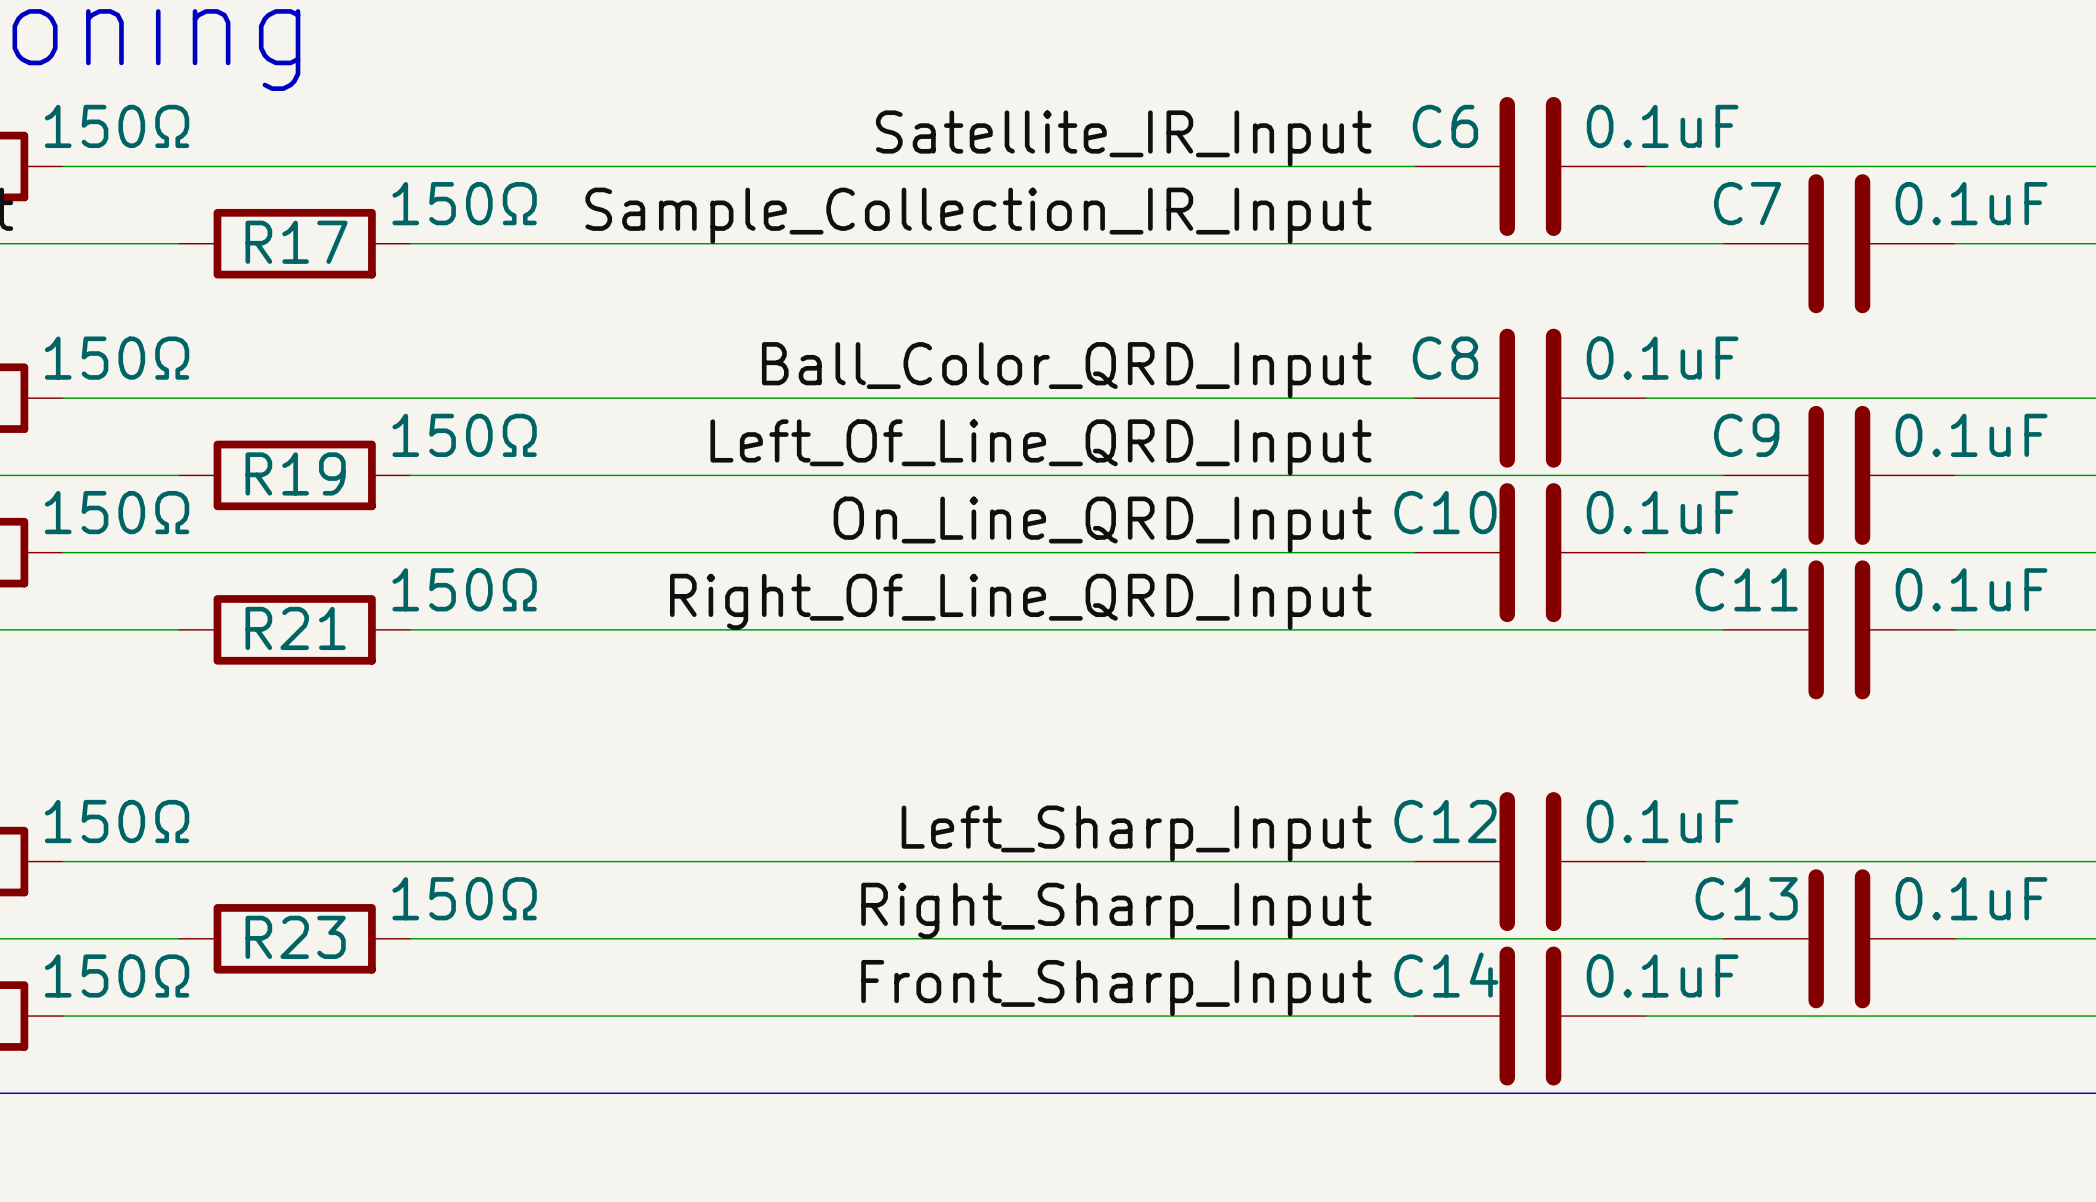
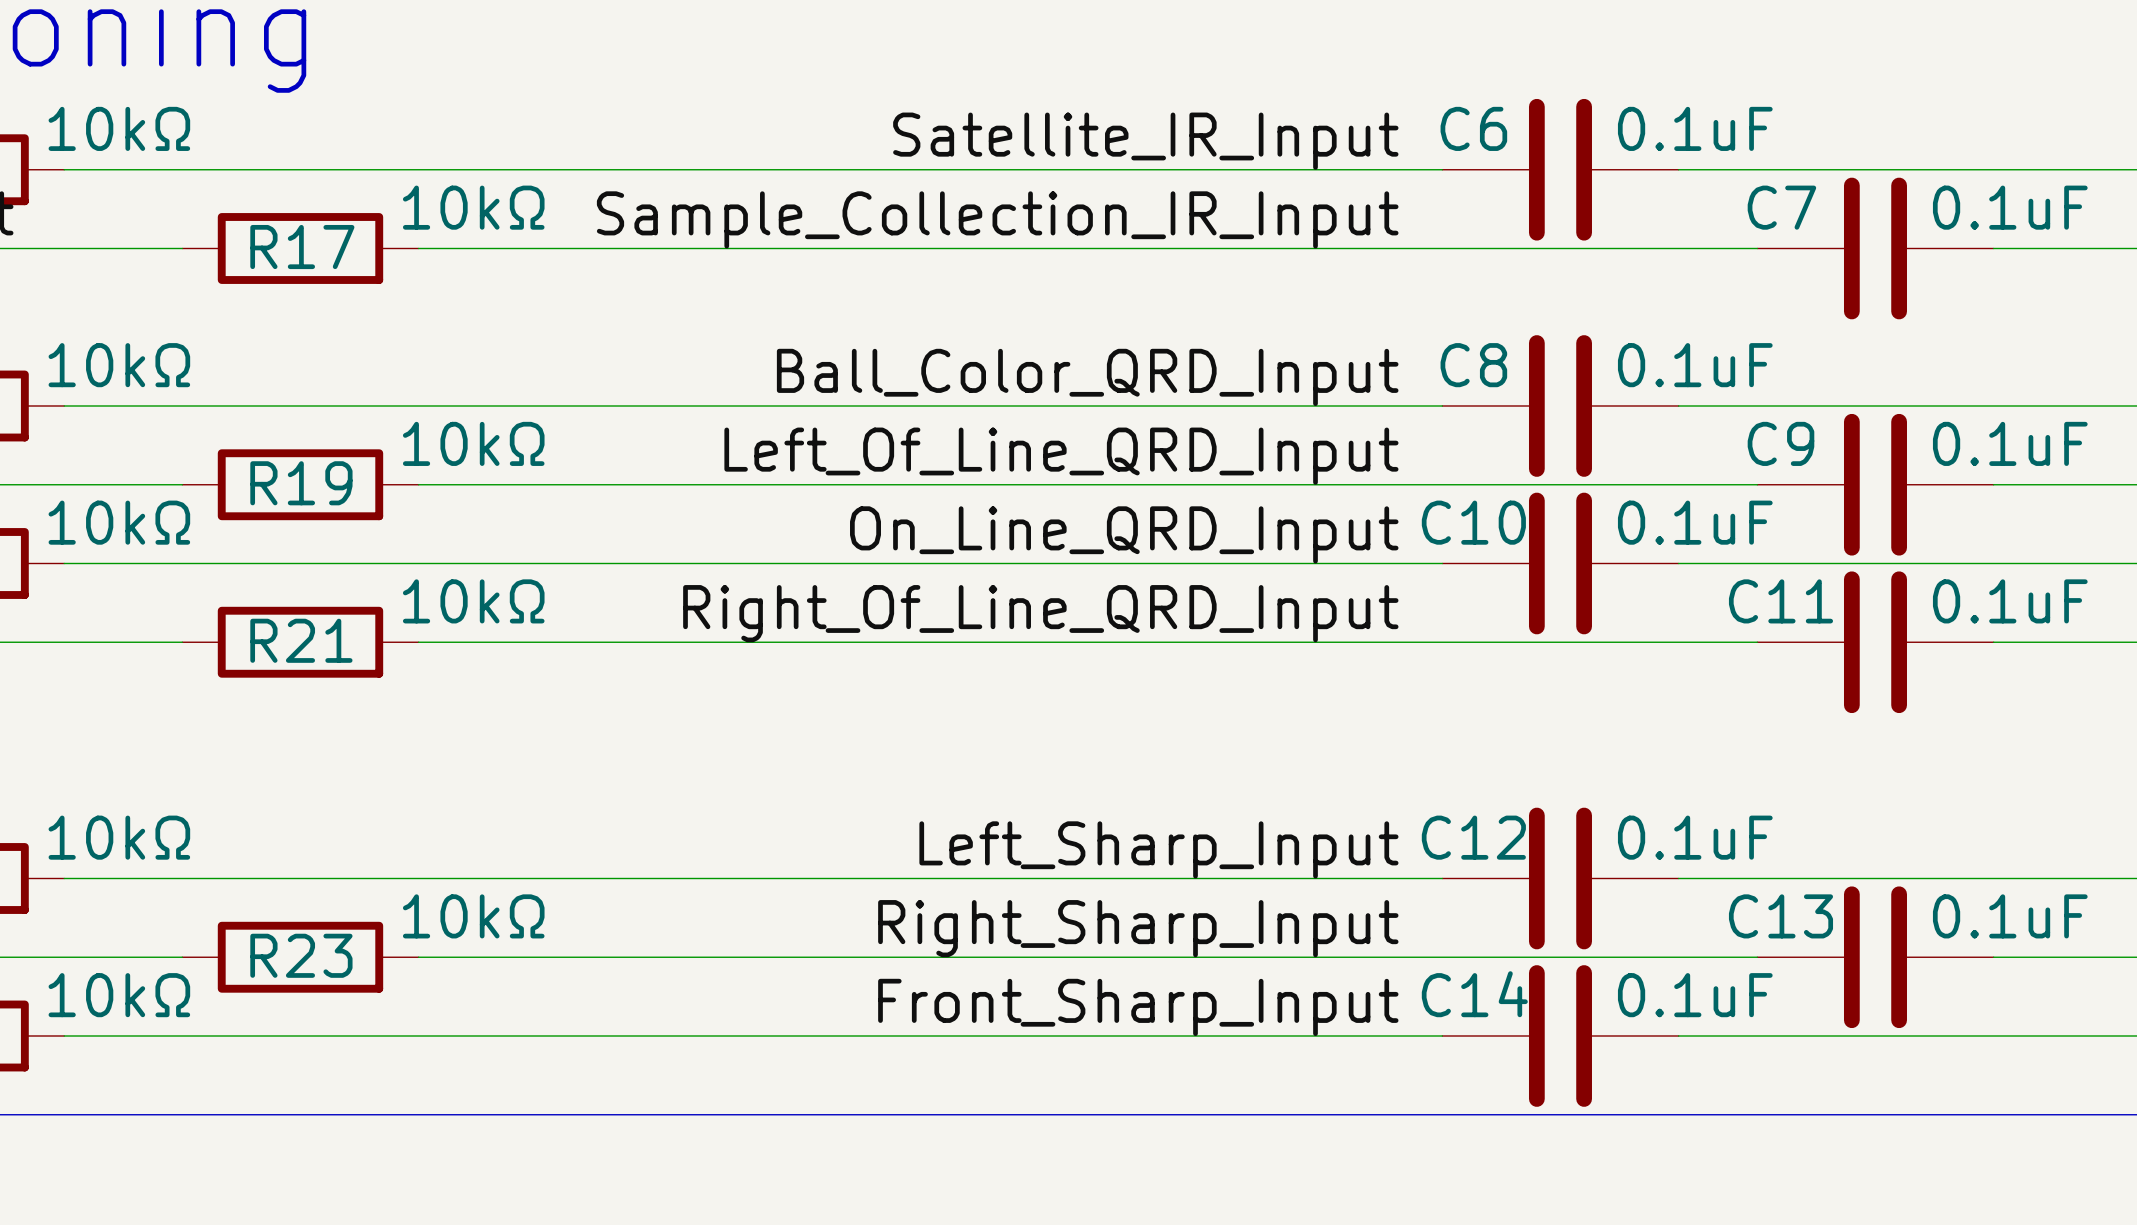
part value: 150Ω (117, 126) -> 10kΩ (119, 128)
R17 value: 150Ω (464, 203) -> 10kΩ (473, 207)
part value: 150Ω (117, 358) -> 10kΩ (119, 365)
R19 value: 150Ω (464, 435) -> 10kΩ (473, 443)
part value: 150Ω (117, 512) -> 10kΩ (119, 522)
R21 value: 150Ω (464, 589) -> 10kΩ (473, 601)
part value: 150Ω (117, 821) -> 10kΩ (119, 837)
R23 value: 150Ω (464, 898) -> 10kΩ (473, 916)
part value: 150Ω (117, 975) -> 10kΩ (119, 995)

